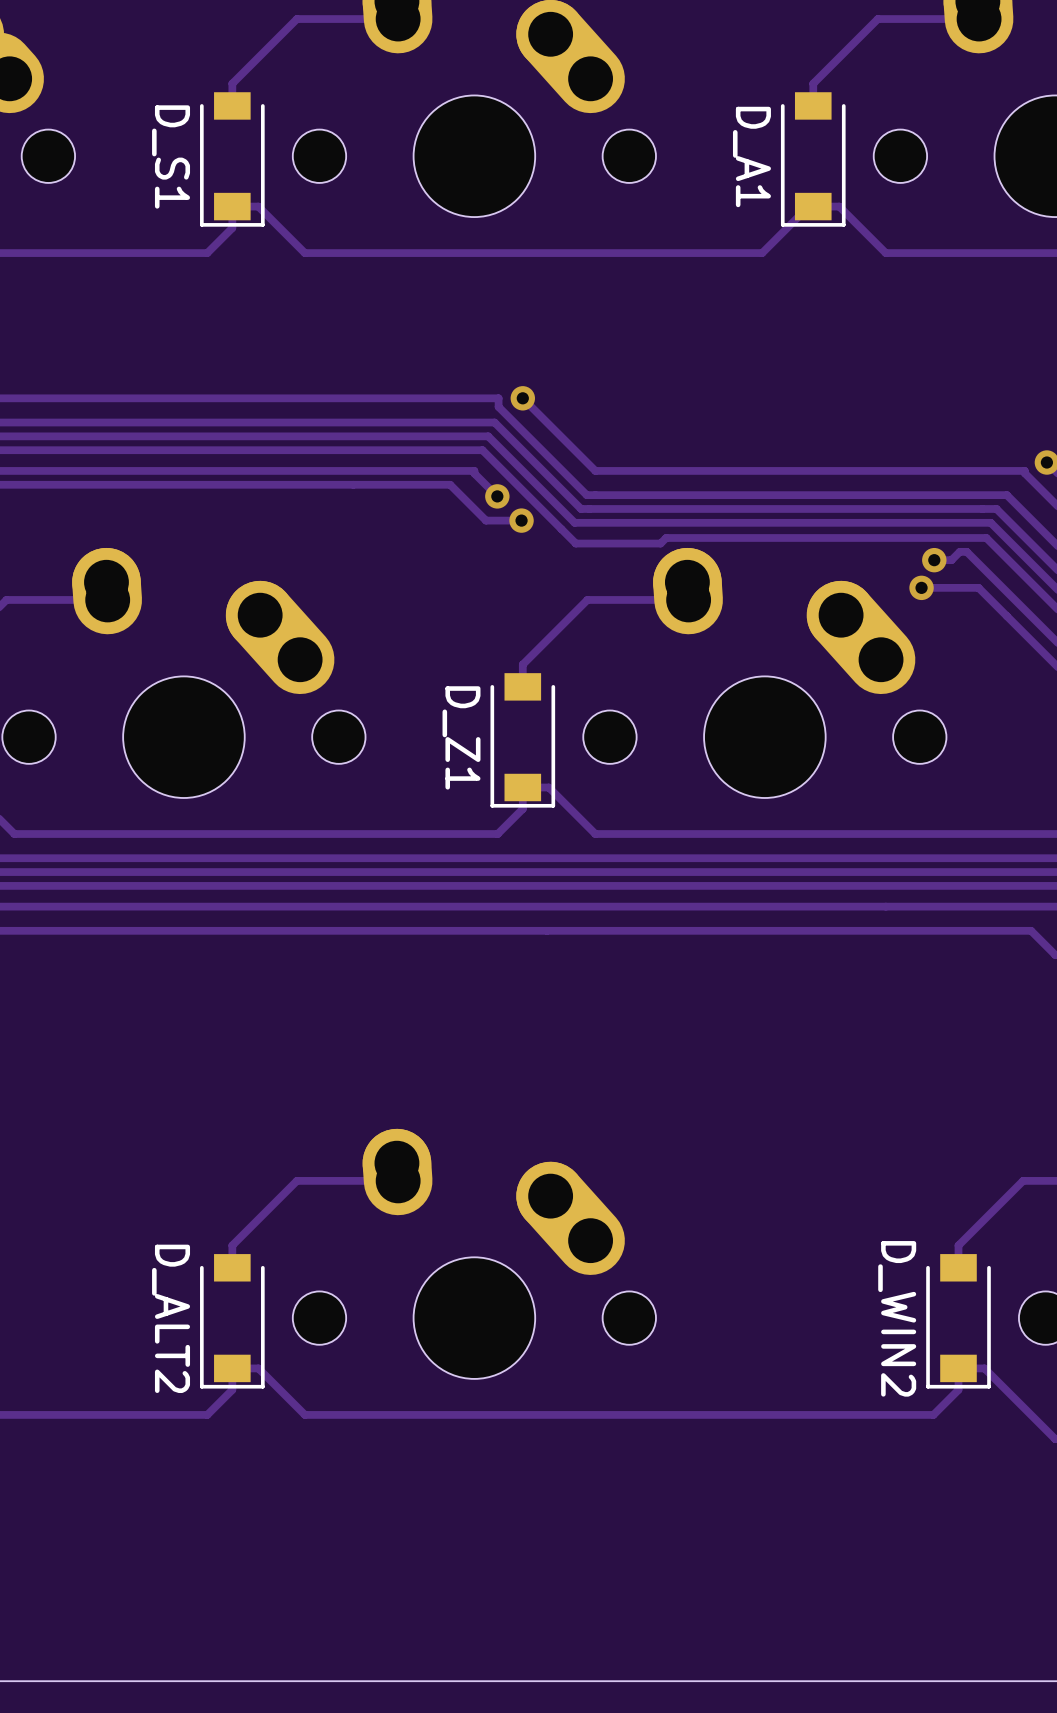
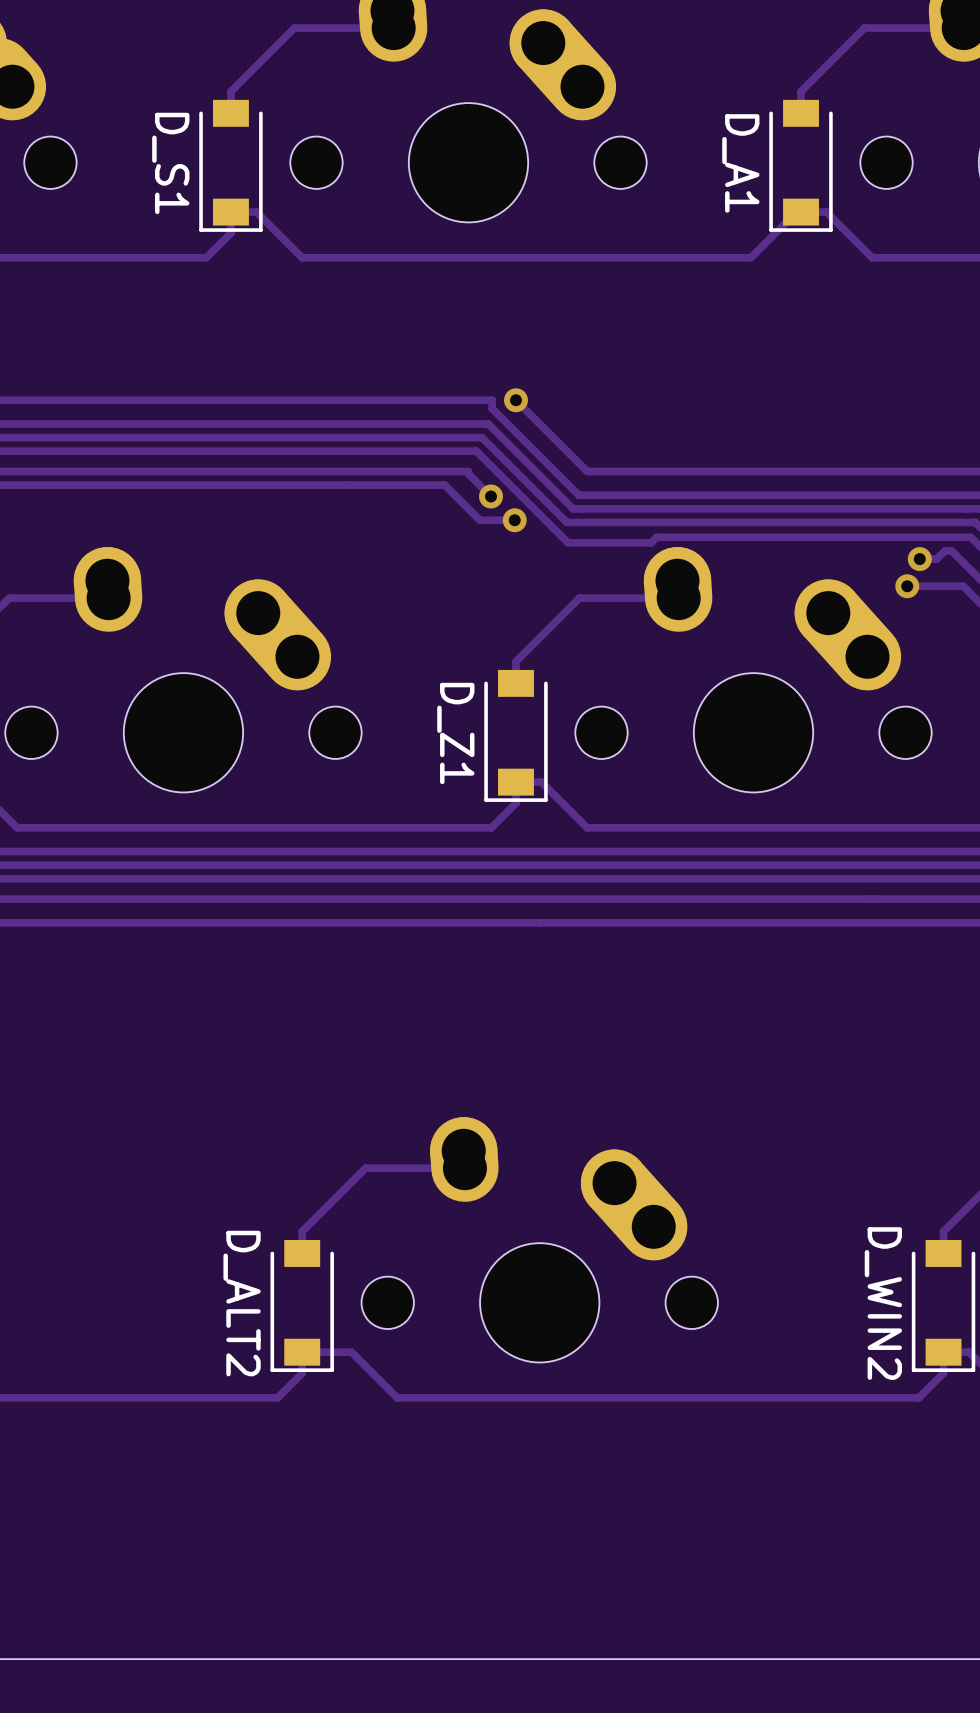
track: (369, 1180) (296, 1180) (232, 1245) (232, 1267) -> (365, 1168) (302, 1231) (302, 1253)
track: none -> (464, 1168) (393, 1168)
part position: (474, 1253) -> (539, 1239)
D_ALT2 position: (232, 1321) -> (302, 1305)
track: (401, 1414) (304, 1414) (258, 1368) (232, 1368) (232, 1389) (207, 1414) -> (397, 1397) (351, 1352) (302, 1352) (302, 1373) (277, 1397) (206, 1397)

